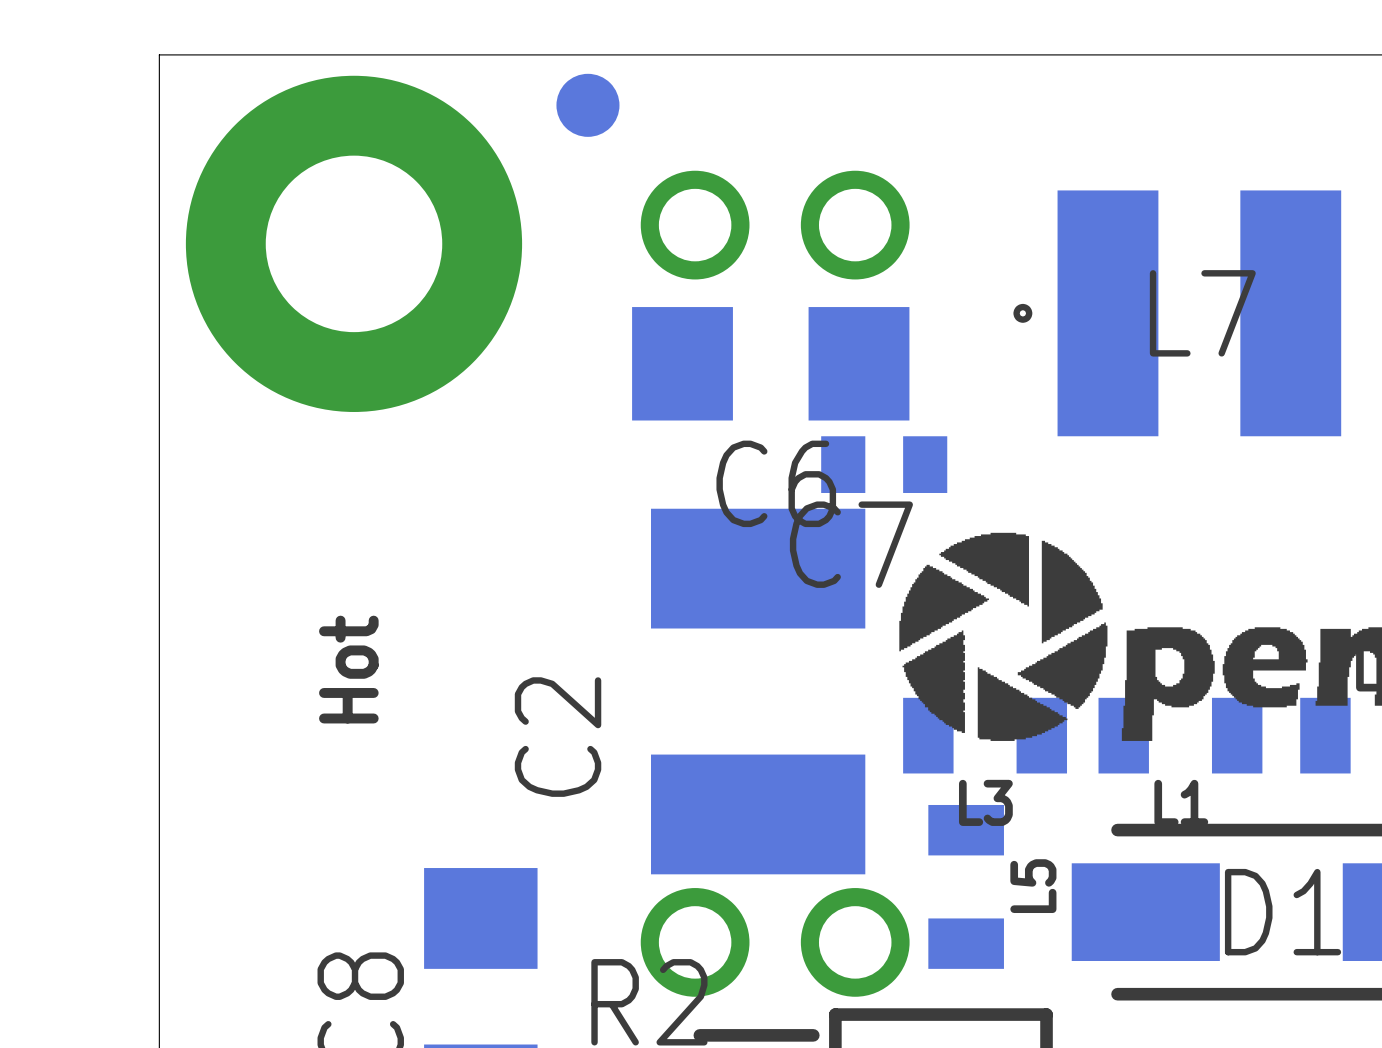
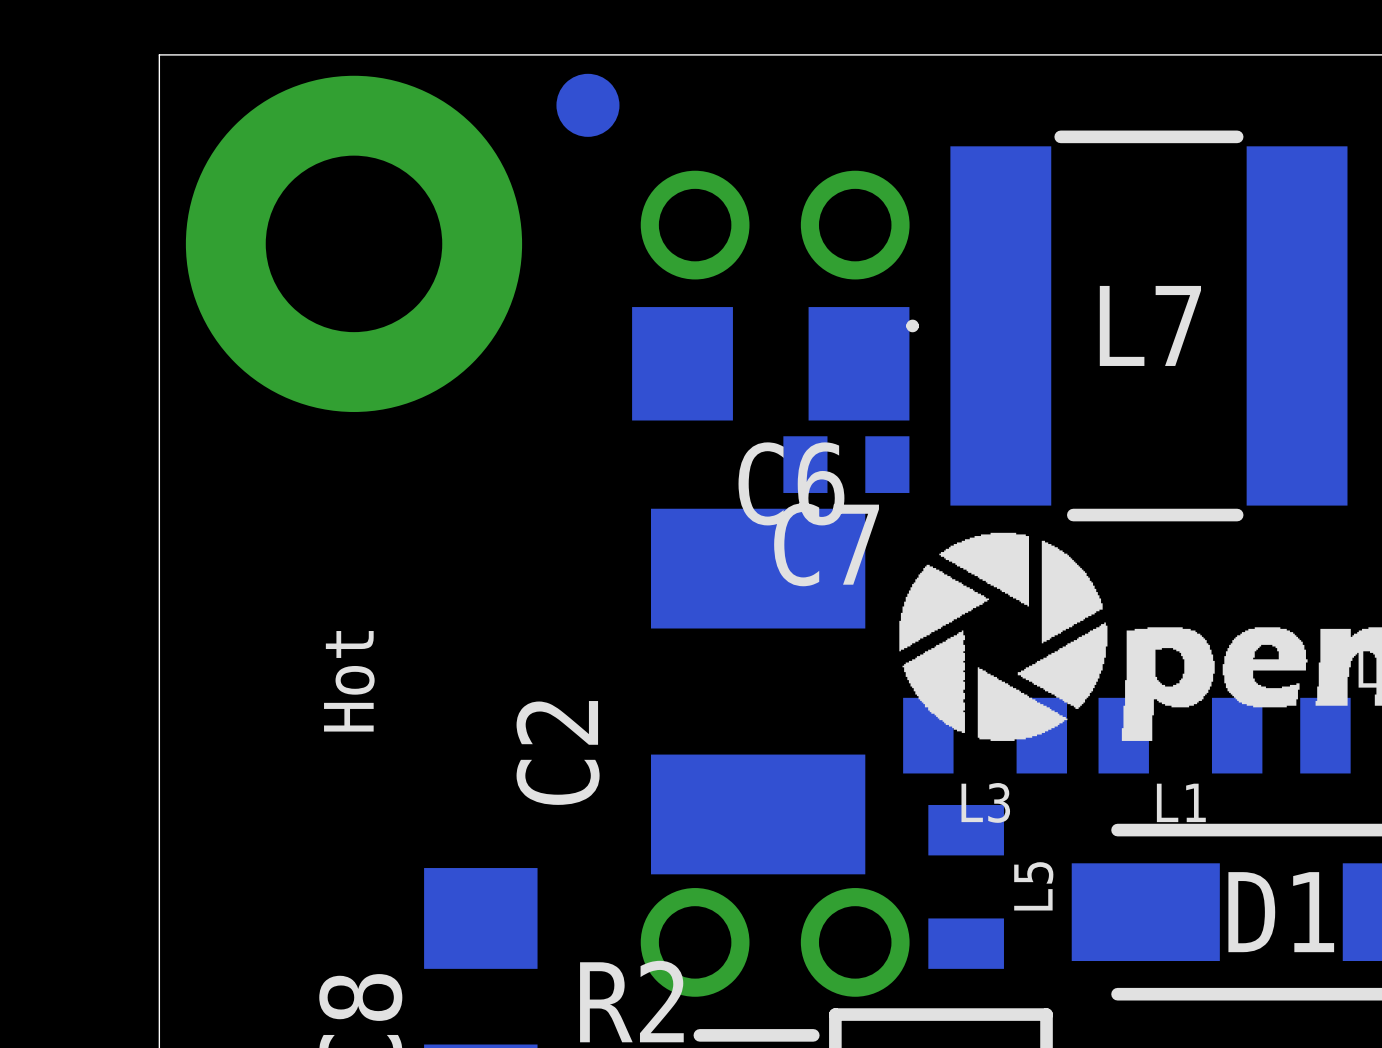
L7 footprint: [1013, 190, 1342, 437] -> [906, 130, 1348, 522]
C7 position: (884, 464) -> (846, 464)

